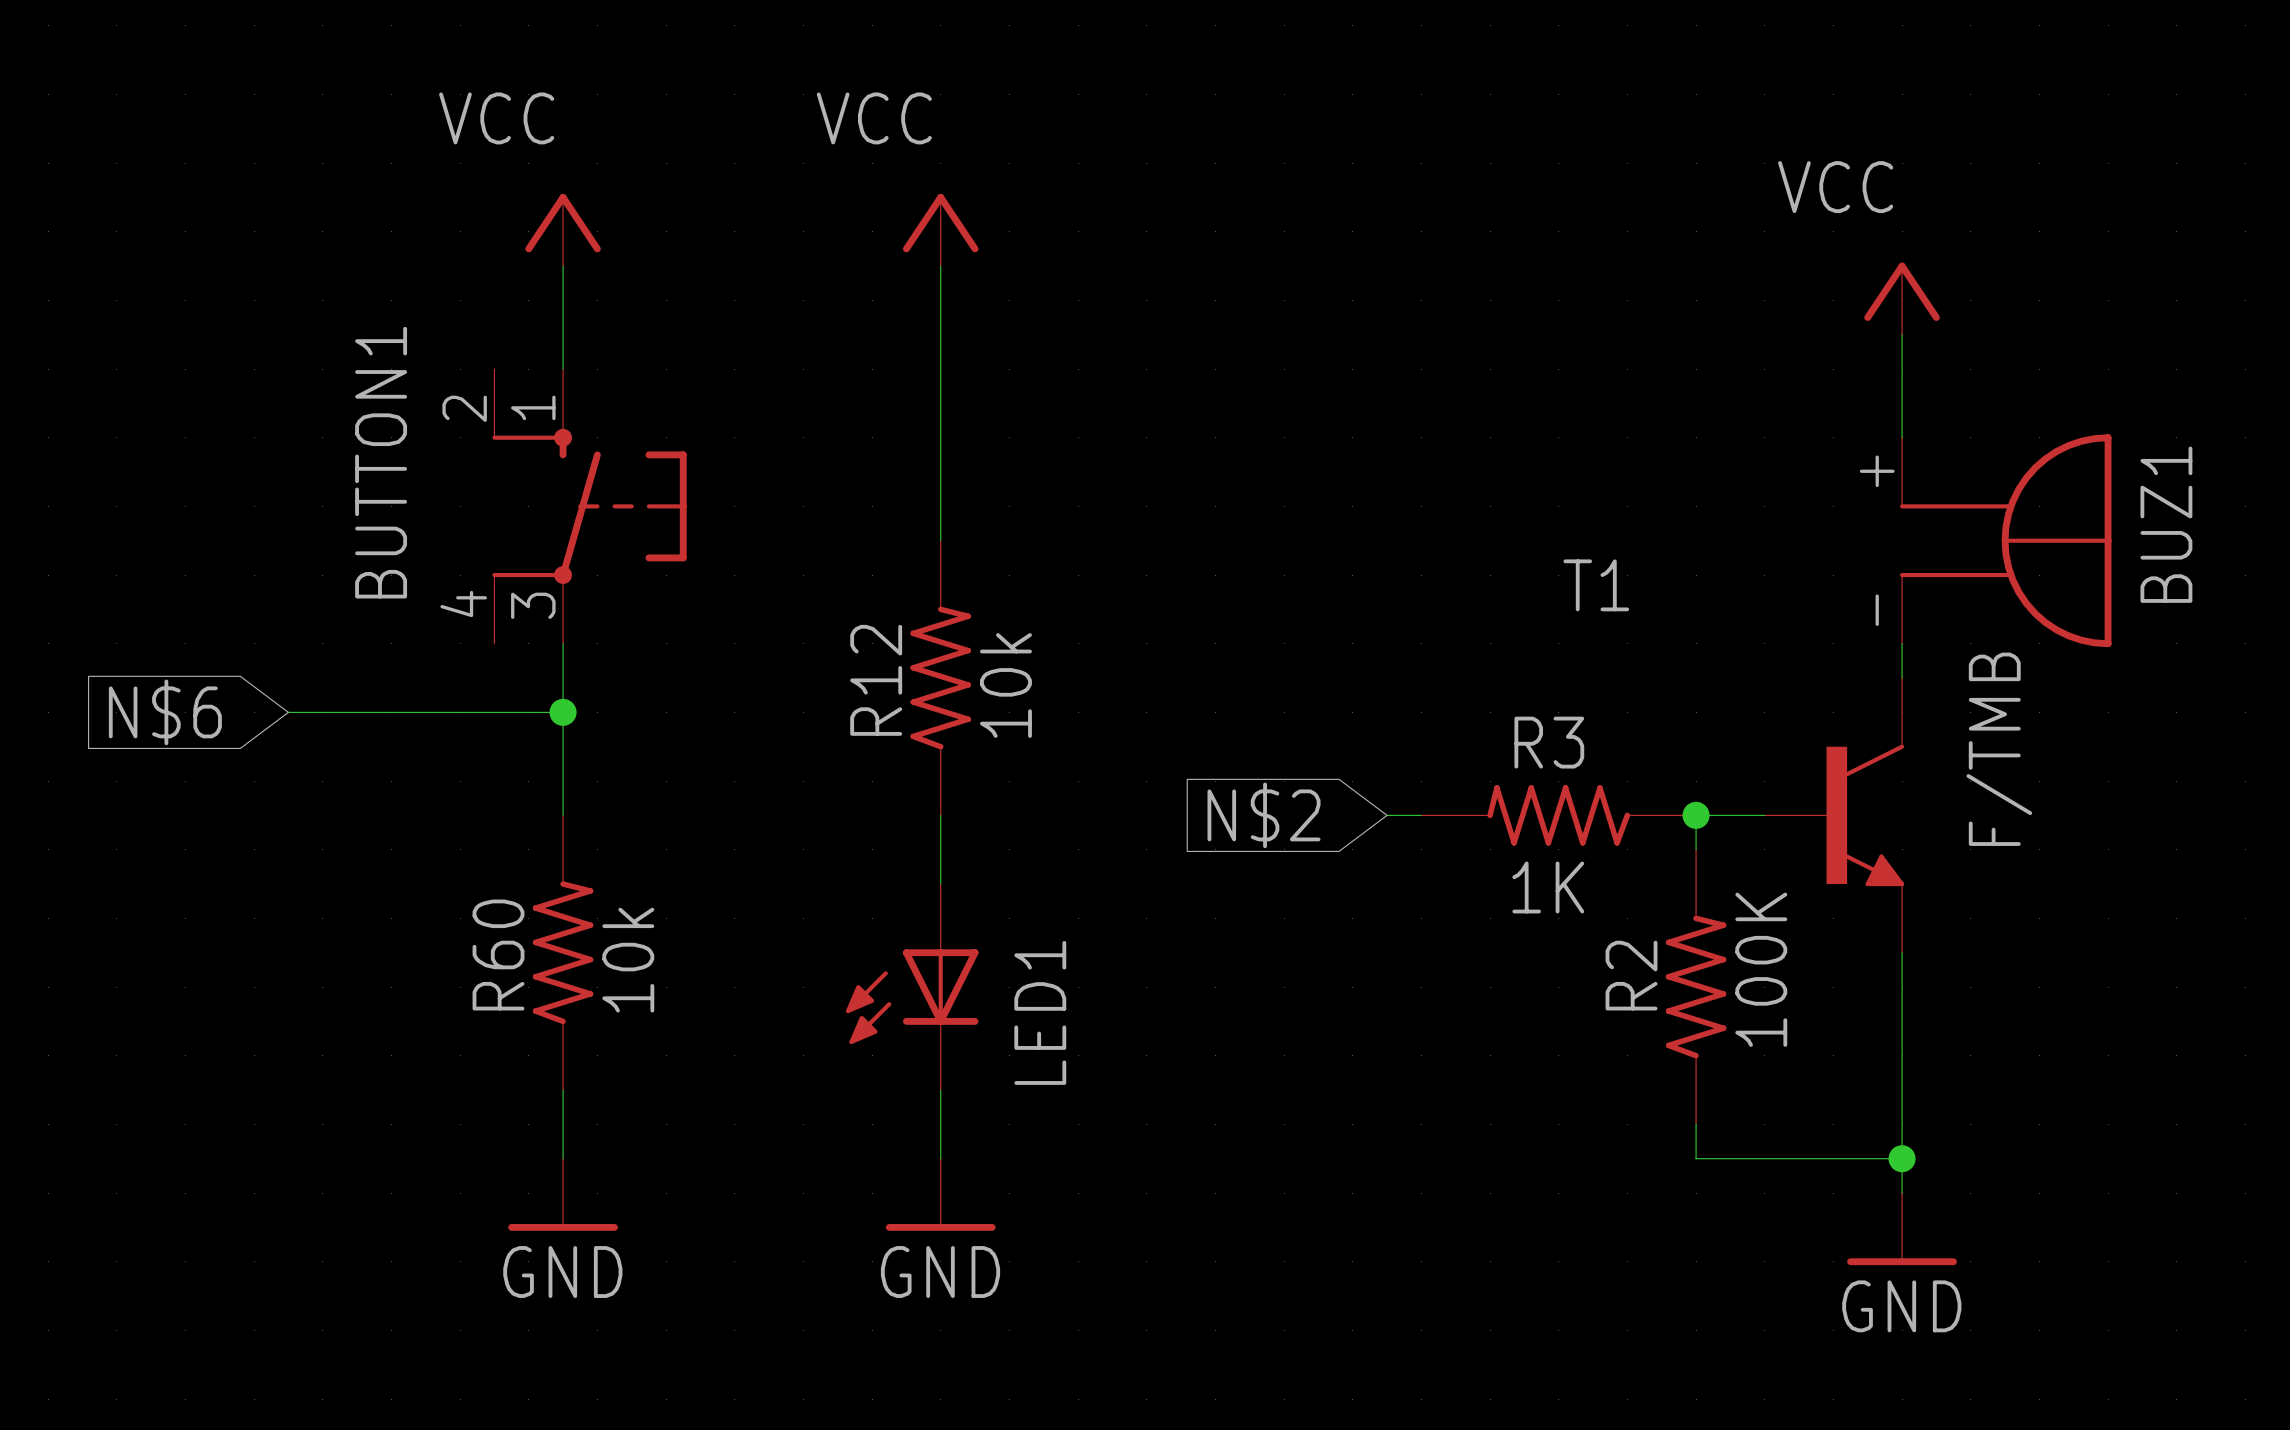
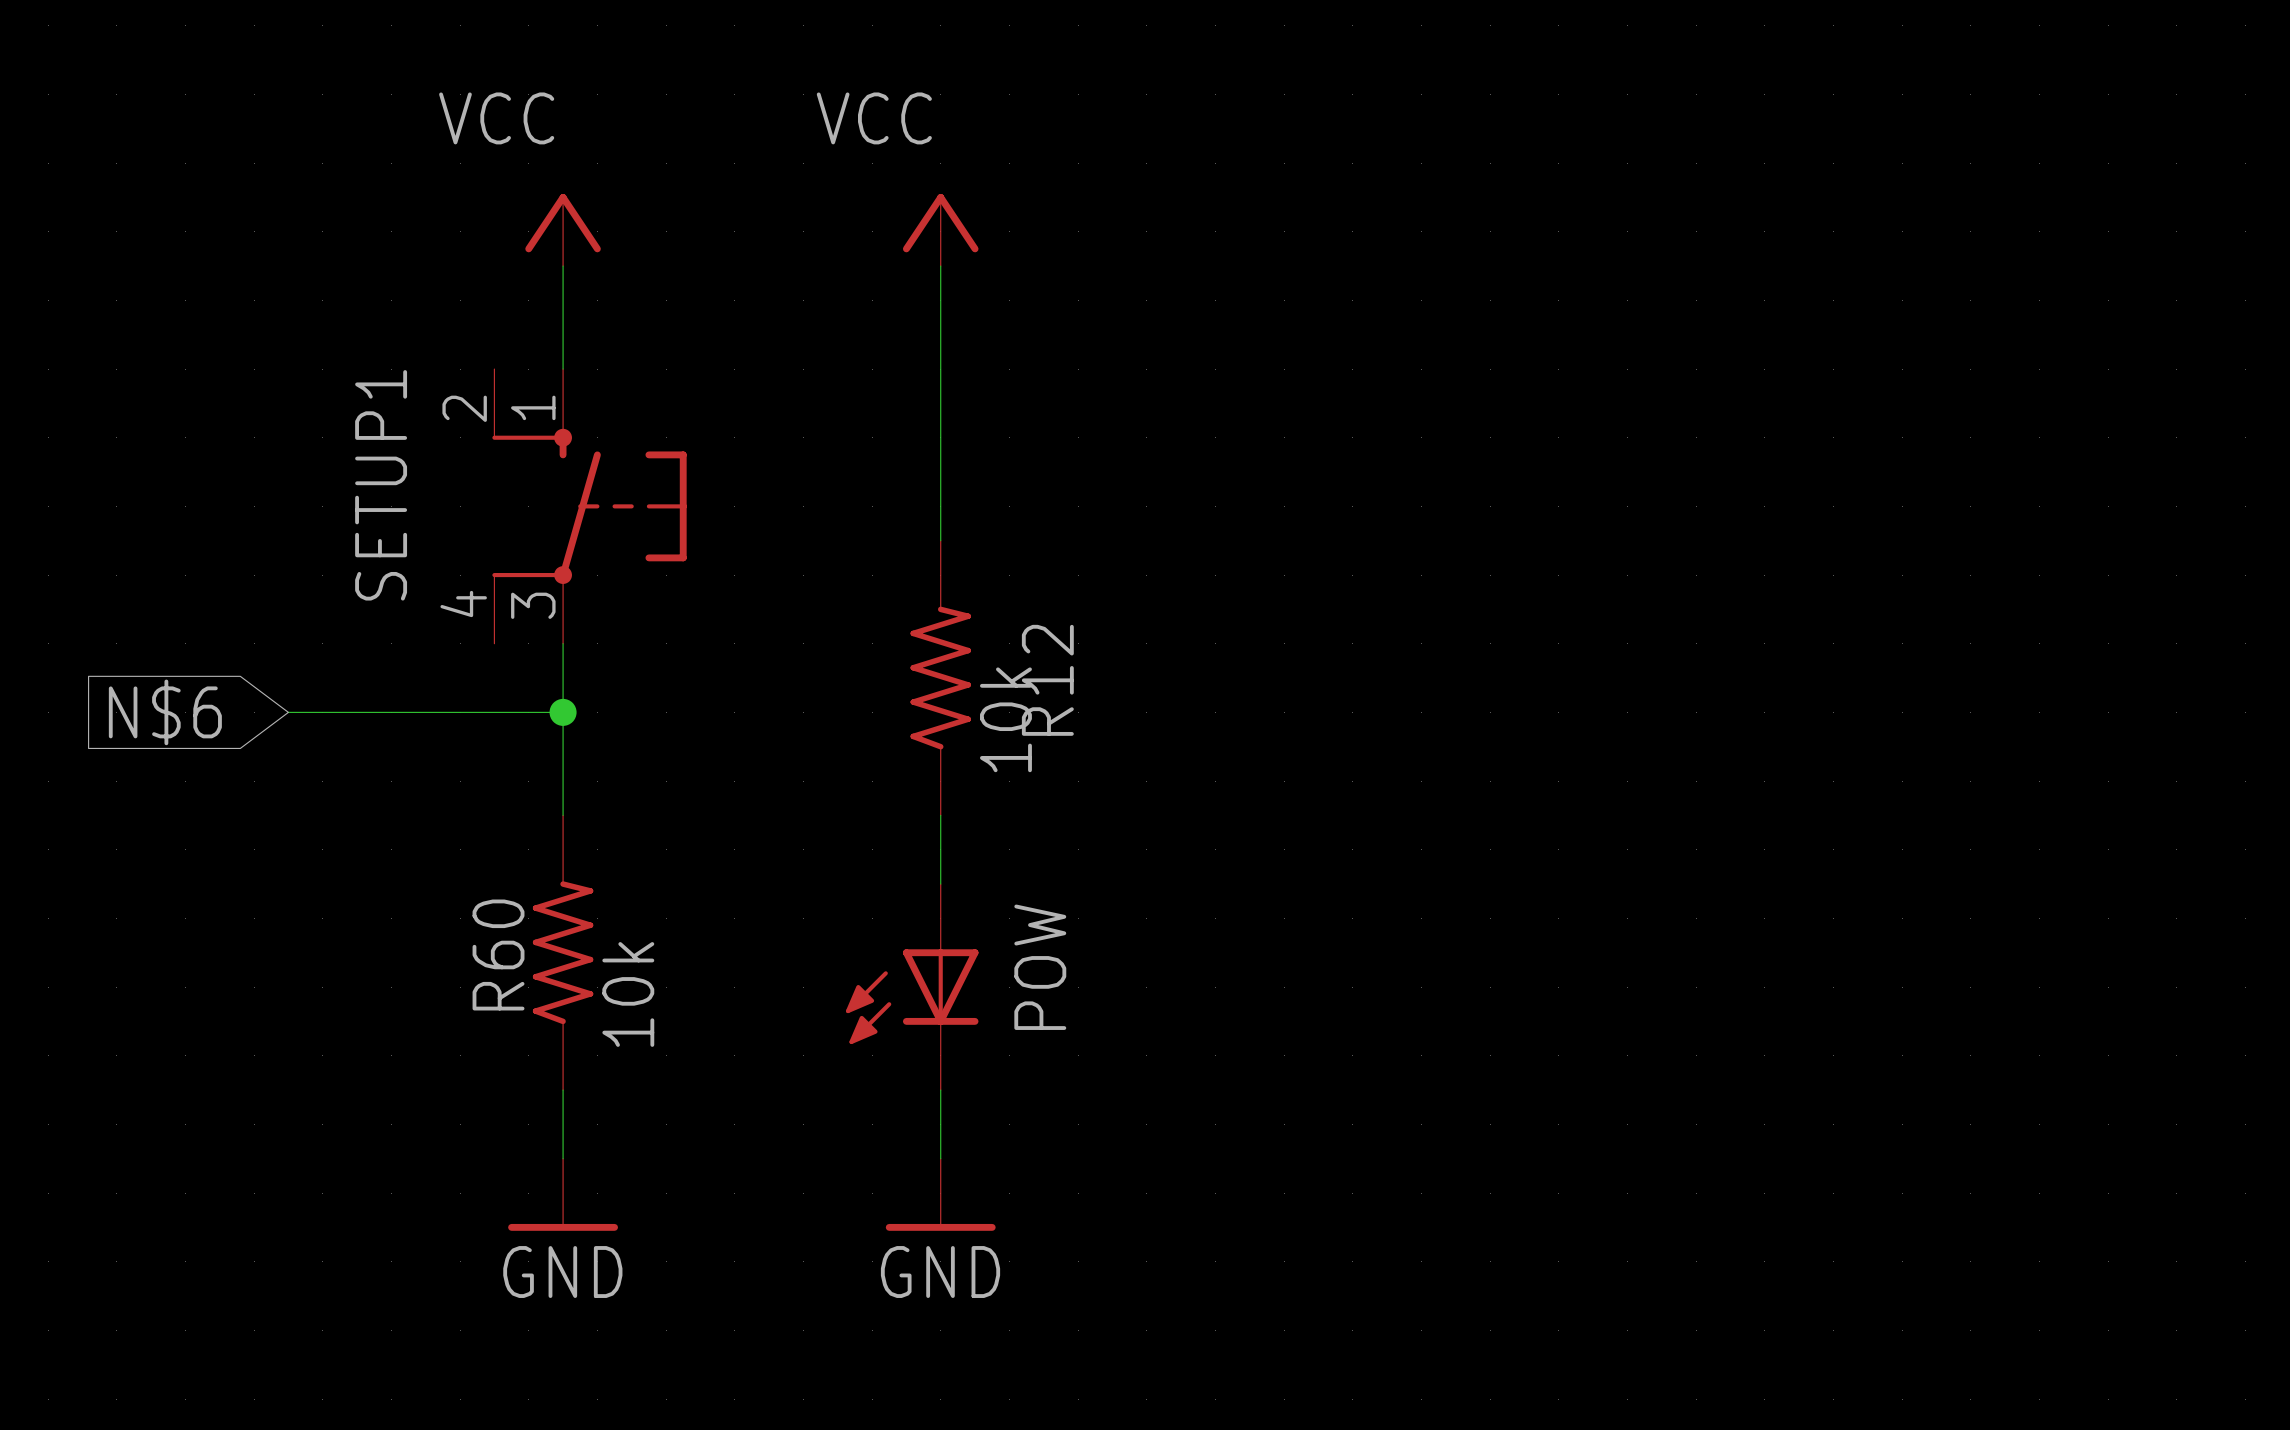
power symbol: VCC (1902, 298) -> none
wire: (1902, 334) (1902, 437) -> none
BUTTON1 name: BUTTON1 (381, 462) -> SETUP1 (381, 485)
BUZ1: F/TMB (2005, 540) -> none
wire: (1902, 643) (1902, 678) -> none
R12 name position: R12 (876, 680) -> R12 (1047, 680)
R12 value position: 10k (1005, 685) -> 10k (1005, 719)
global label: N$2 (1264, 815) -> none
wire: (1387, 815) (1421, 815) -> none
R3: 1K (1558, 815) -> none
junction: (1696, 815) -> none
wire: (1764, 815) (1696, 815) (1696, 849) -> none
T1: (1834, 815) -> none
wire: (1902, 952) (1902, 1193) -> none
R60 value position: 10k (628, 960) -> 10k (628, 994)
R2: 100K (1696, 987) -> none
LED1 name: LED1 (1040, 1012) -> POW (1040, 967)
wire: (1696, 1124) (1696, 1158) (1902, 1158) -> none
junction: (1902, 1158) -> none
power symbol: GND (1902, 1229) -> none

